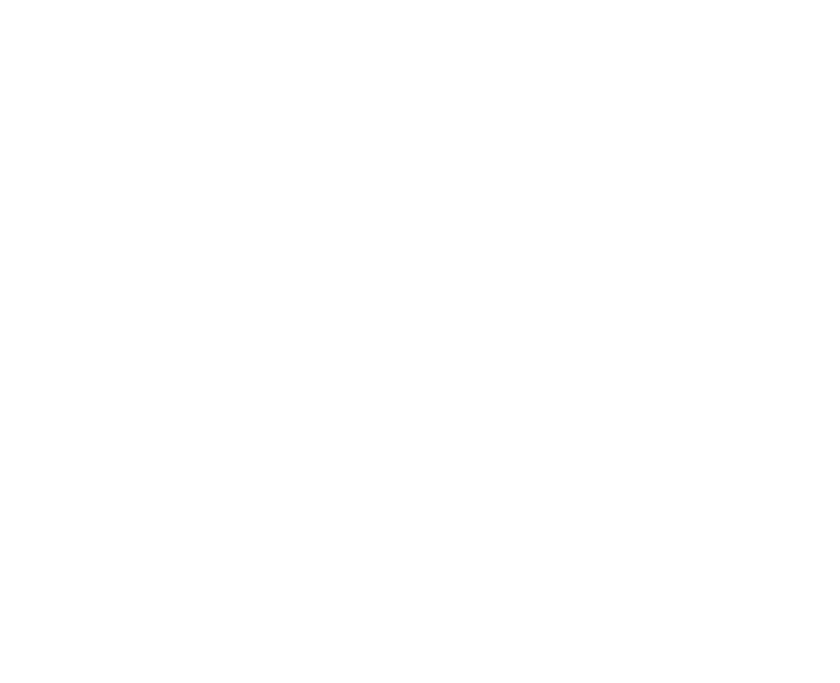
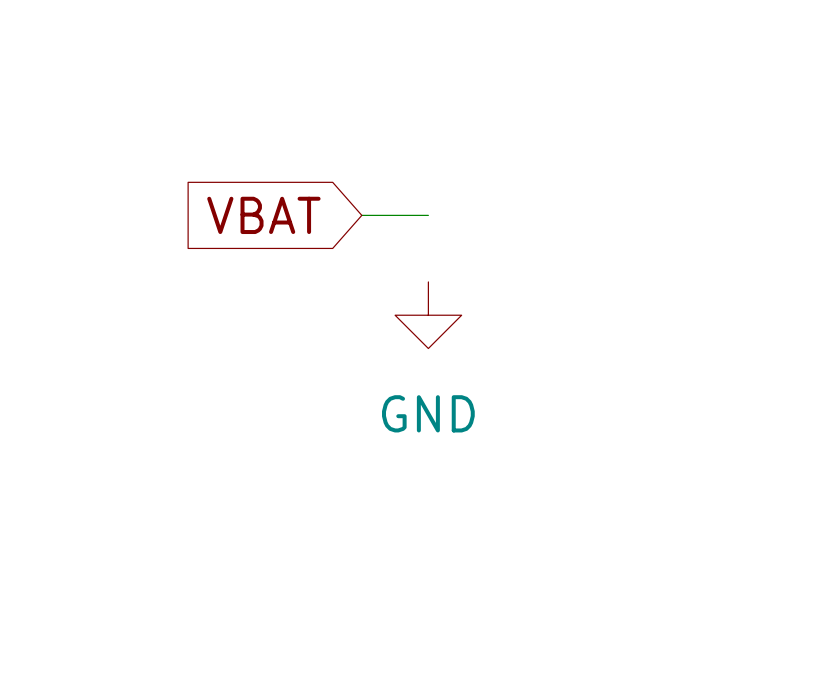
global label: none -> VBAT (263, 215)
wire: none -> (361, 215) (428, 215)
power symbol: none -> GND (428, 315)

